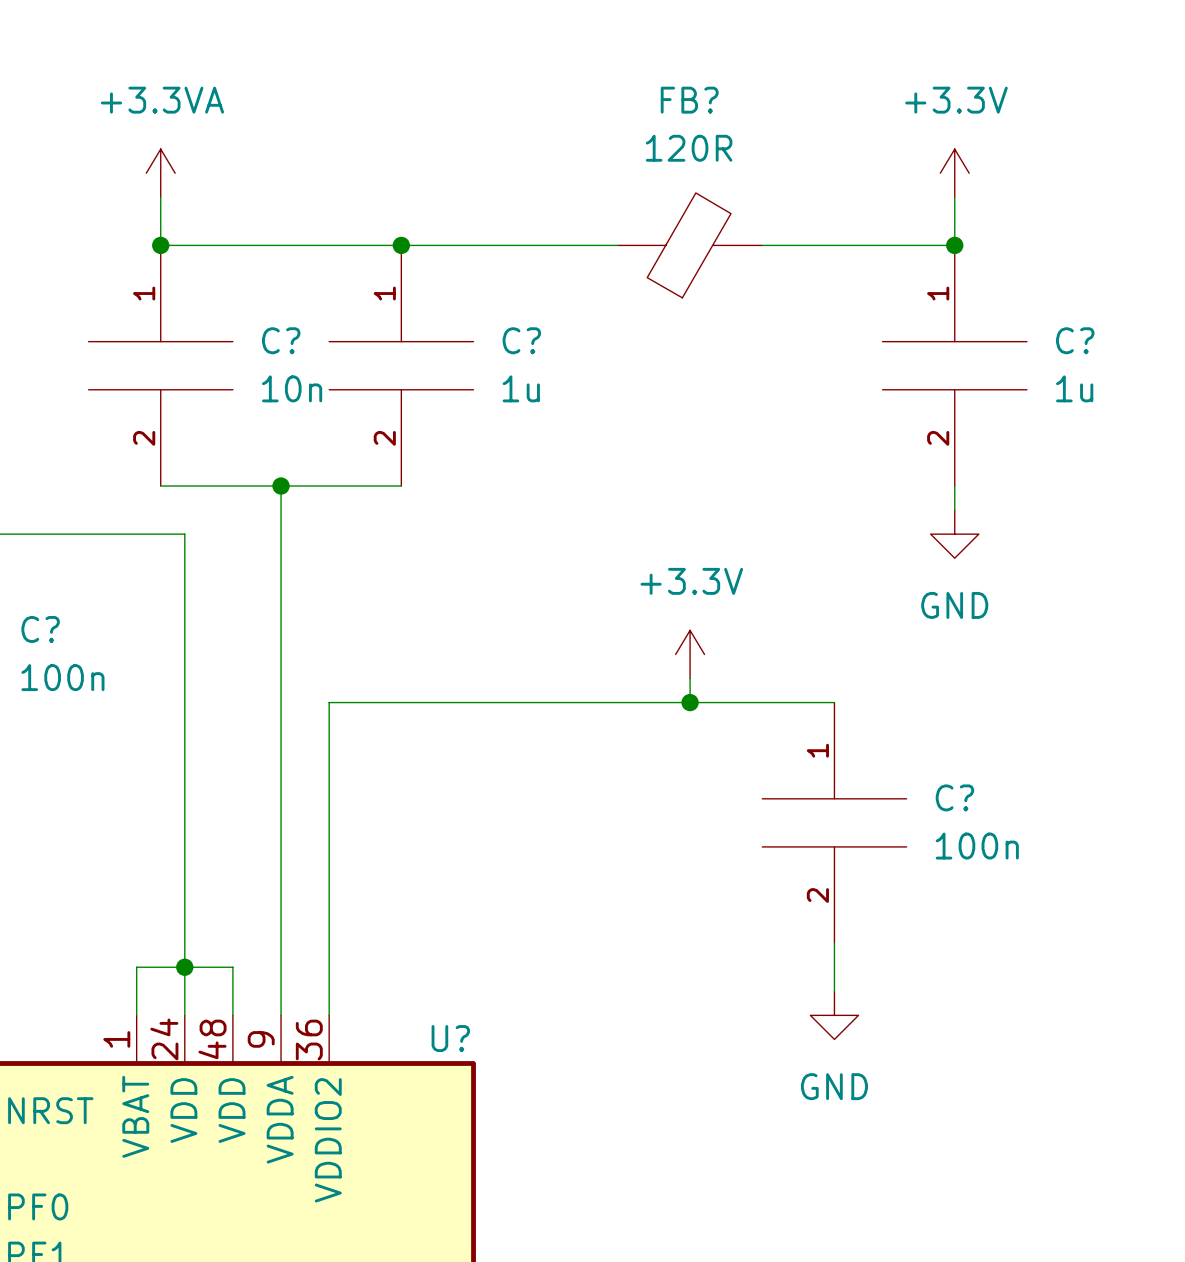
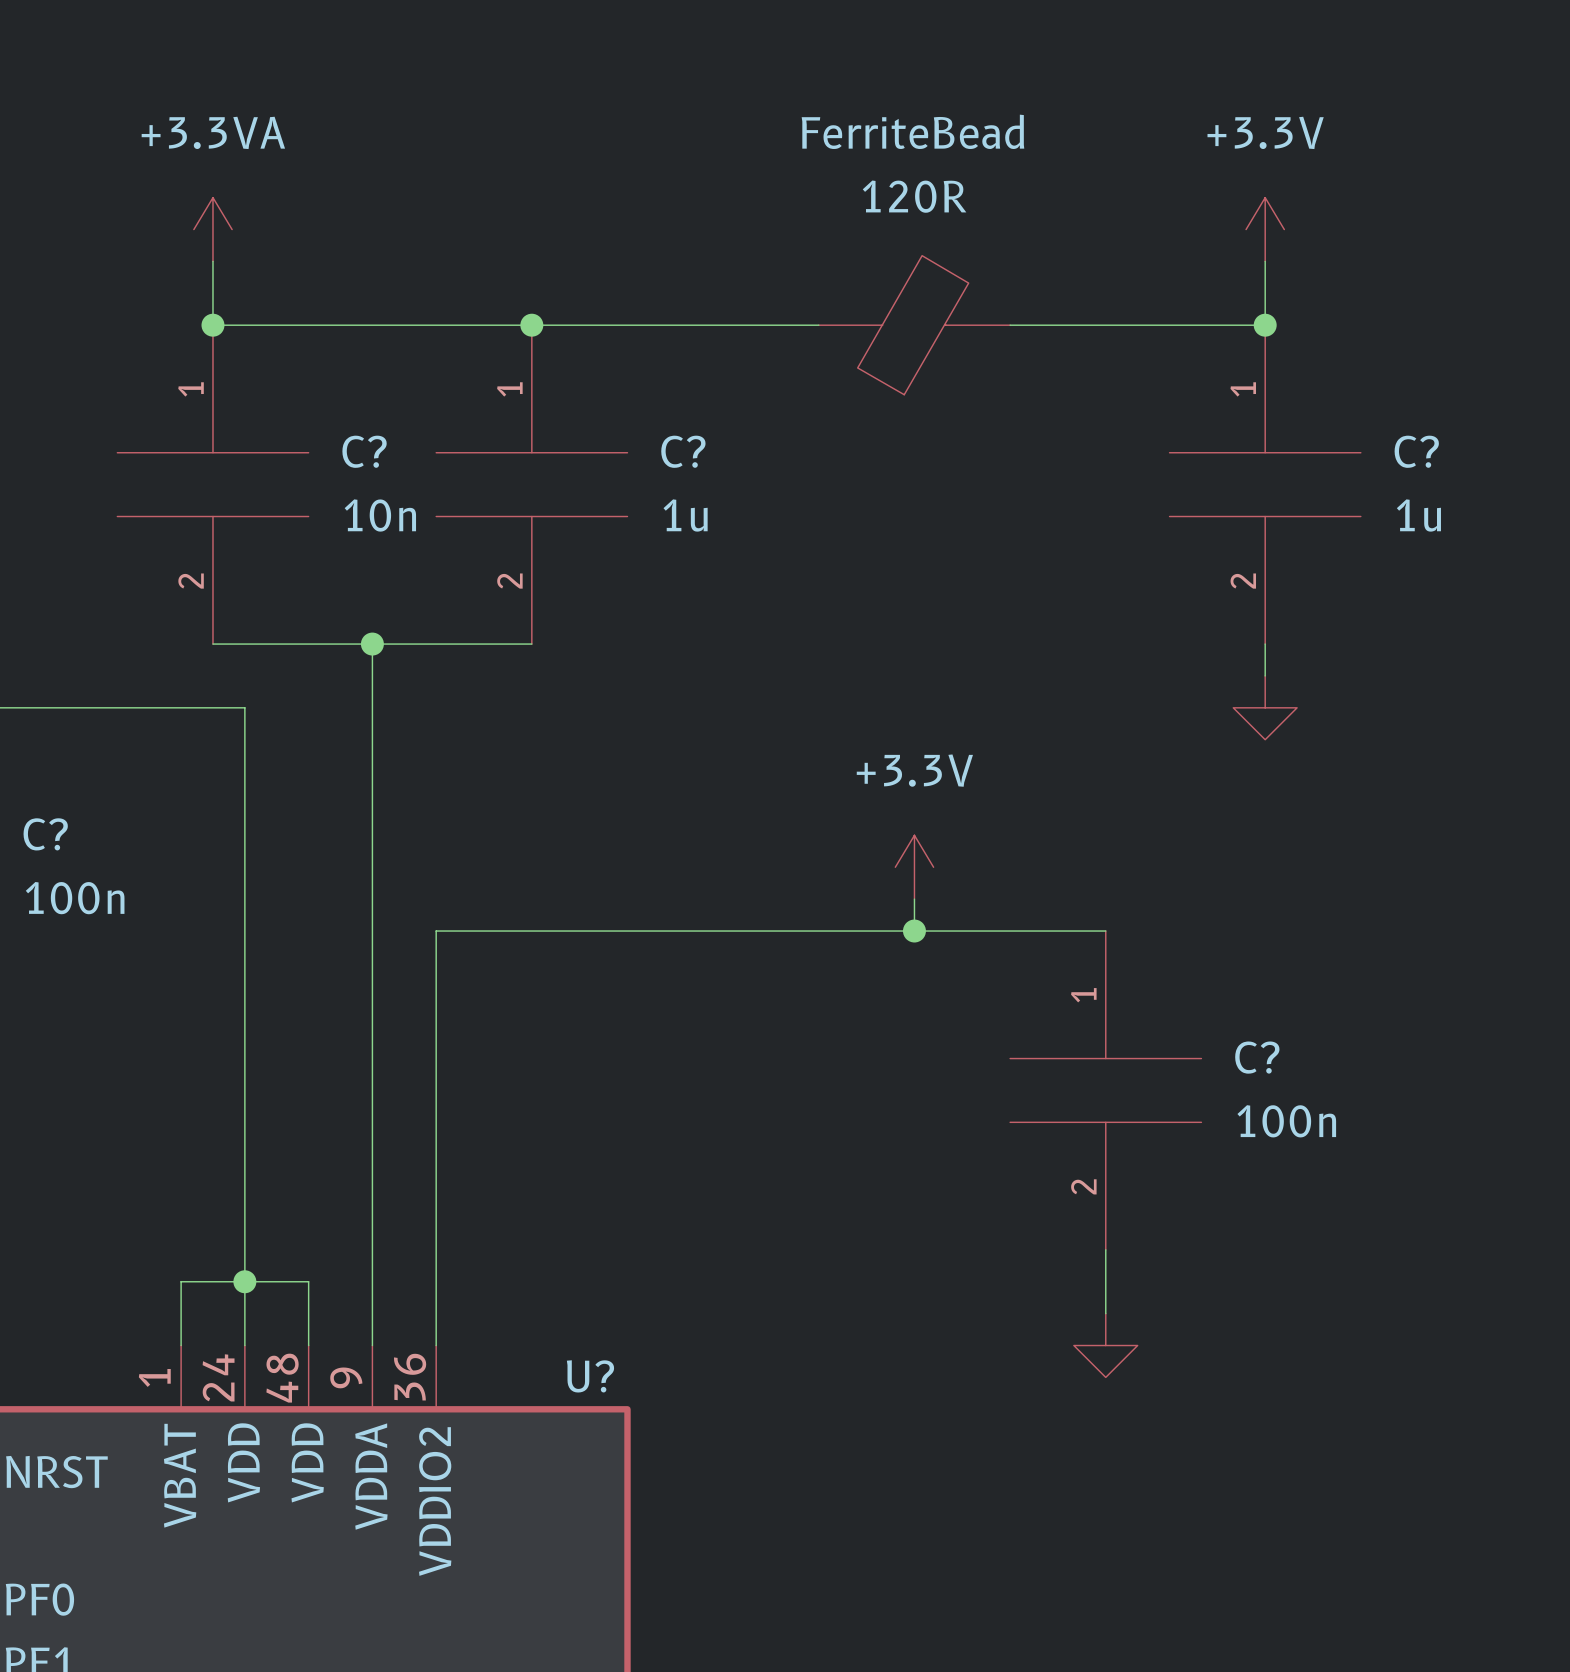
FB? name: FB? (689, 100) -> FerriteBead (912, 131)
power symbol text: GND (954, 605) -> none
power symbol text: GND (834, 1086) -> none

